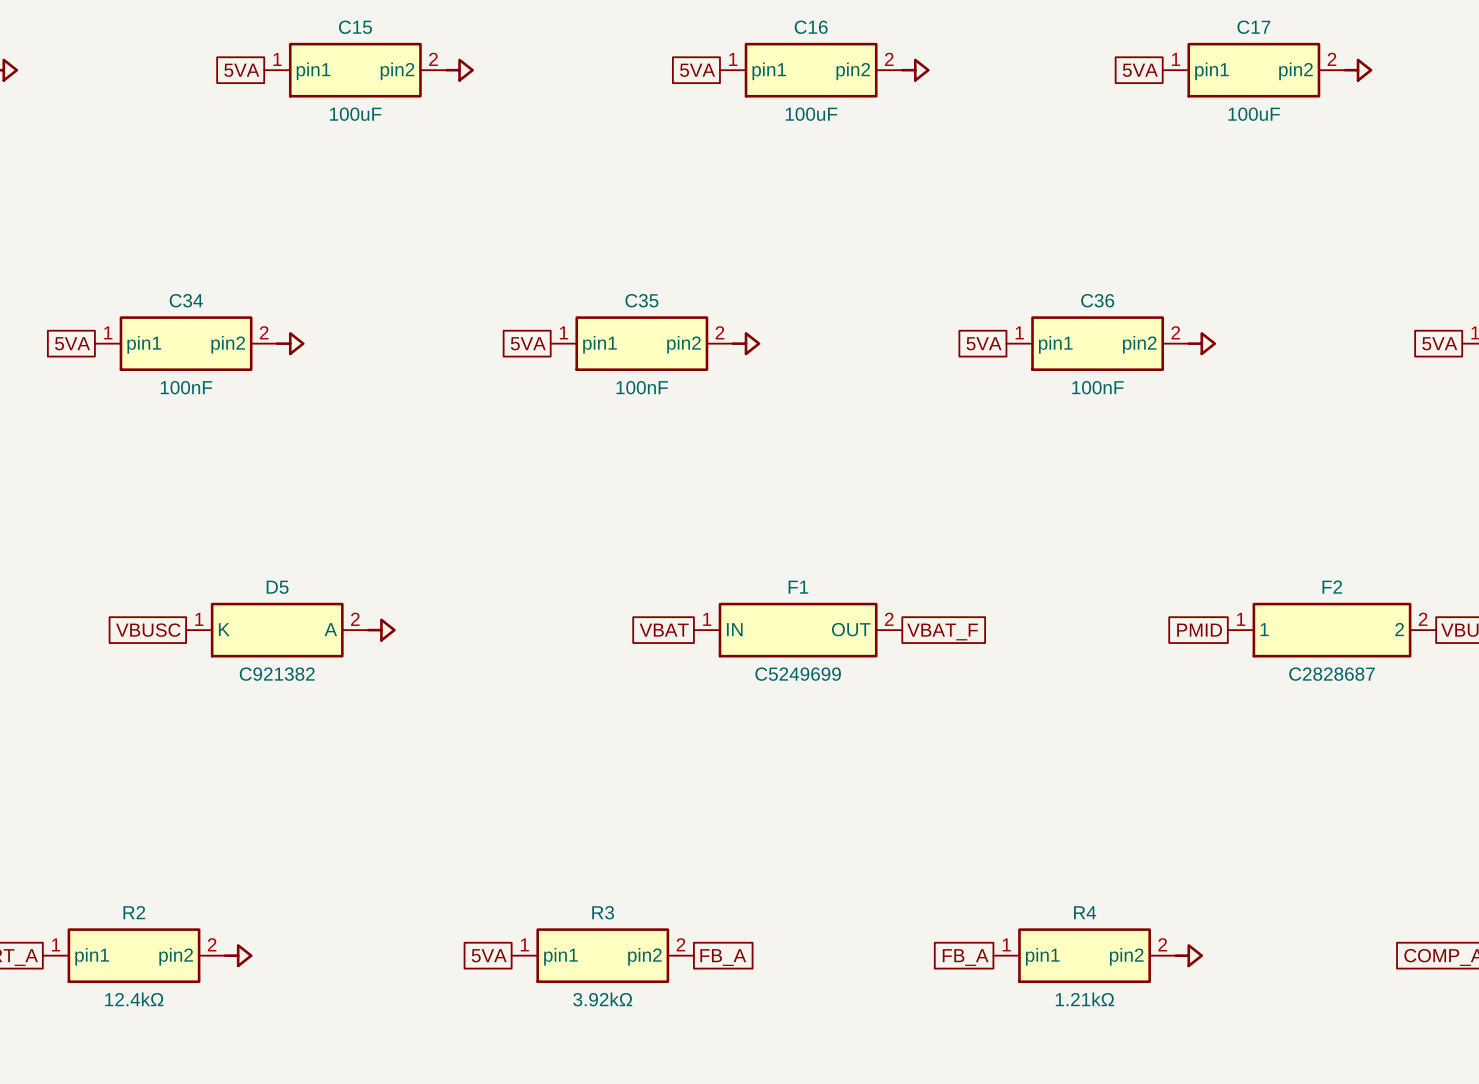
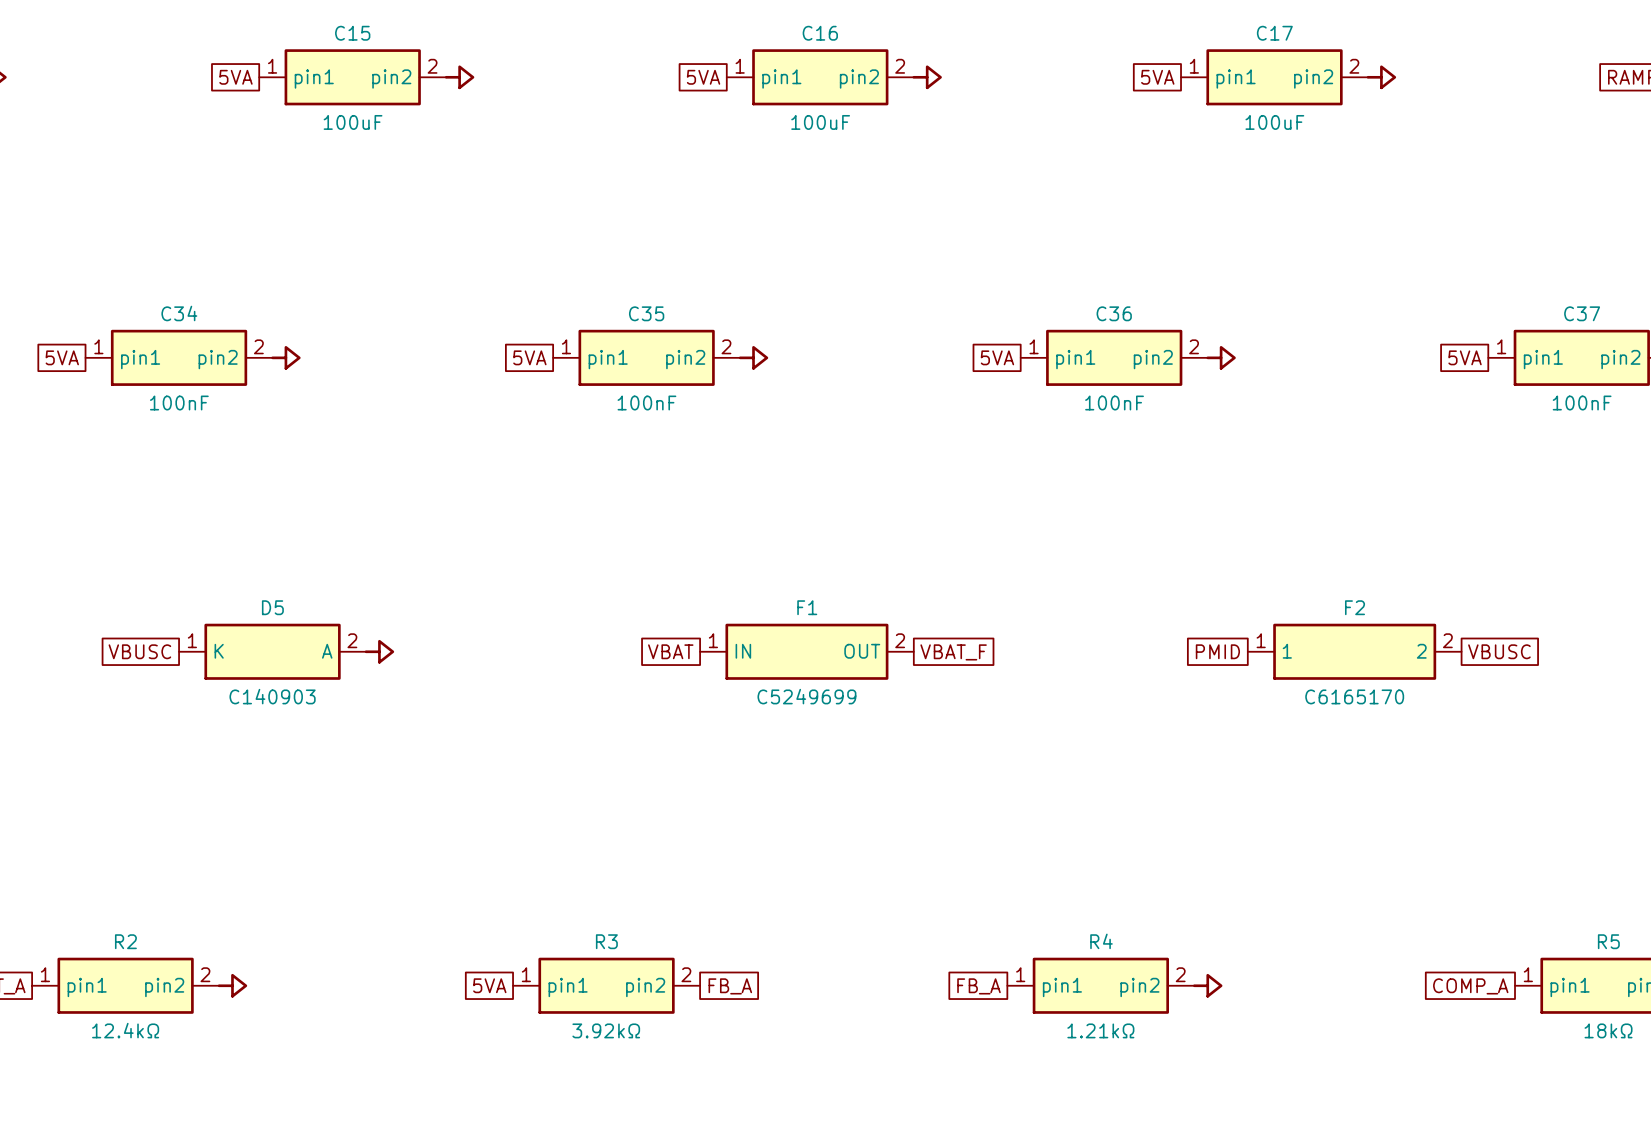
D5 value: C921382 (277, 674) -> C140903 (272, 696)
F2 value: C2828687 (1332, 674) -> C6165170 (1354, 696)

